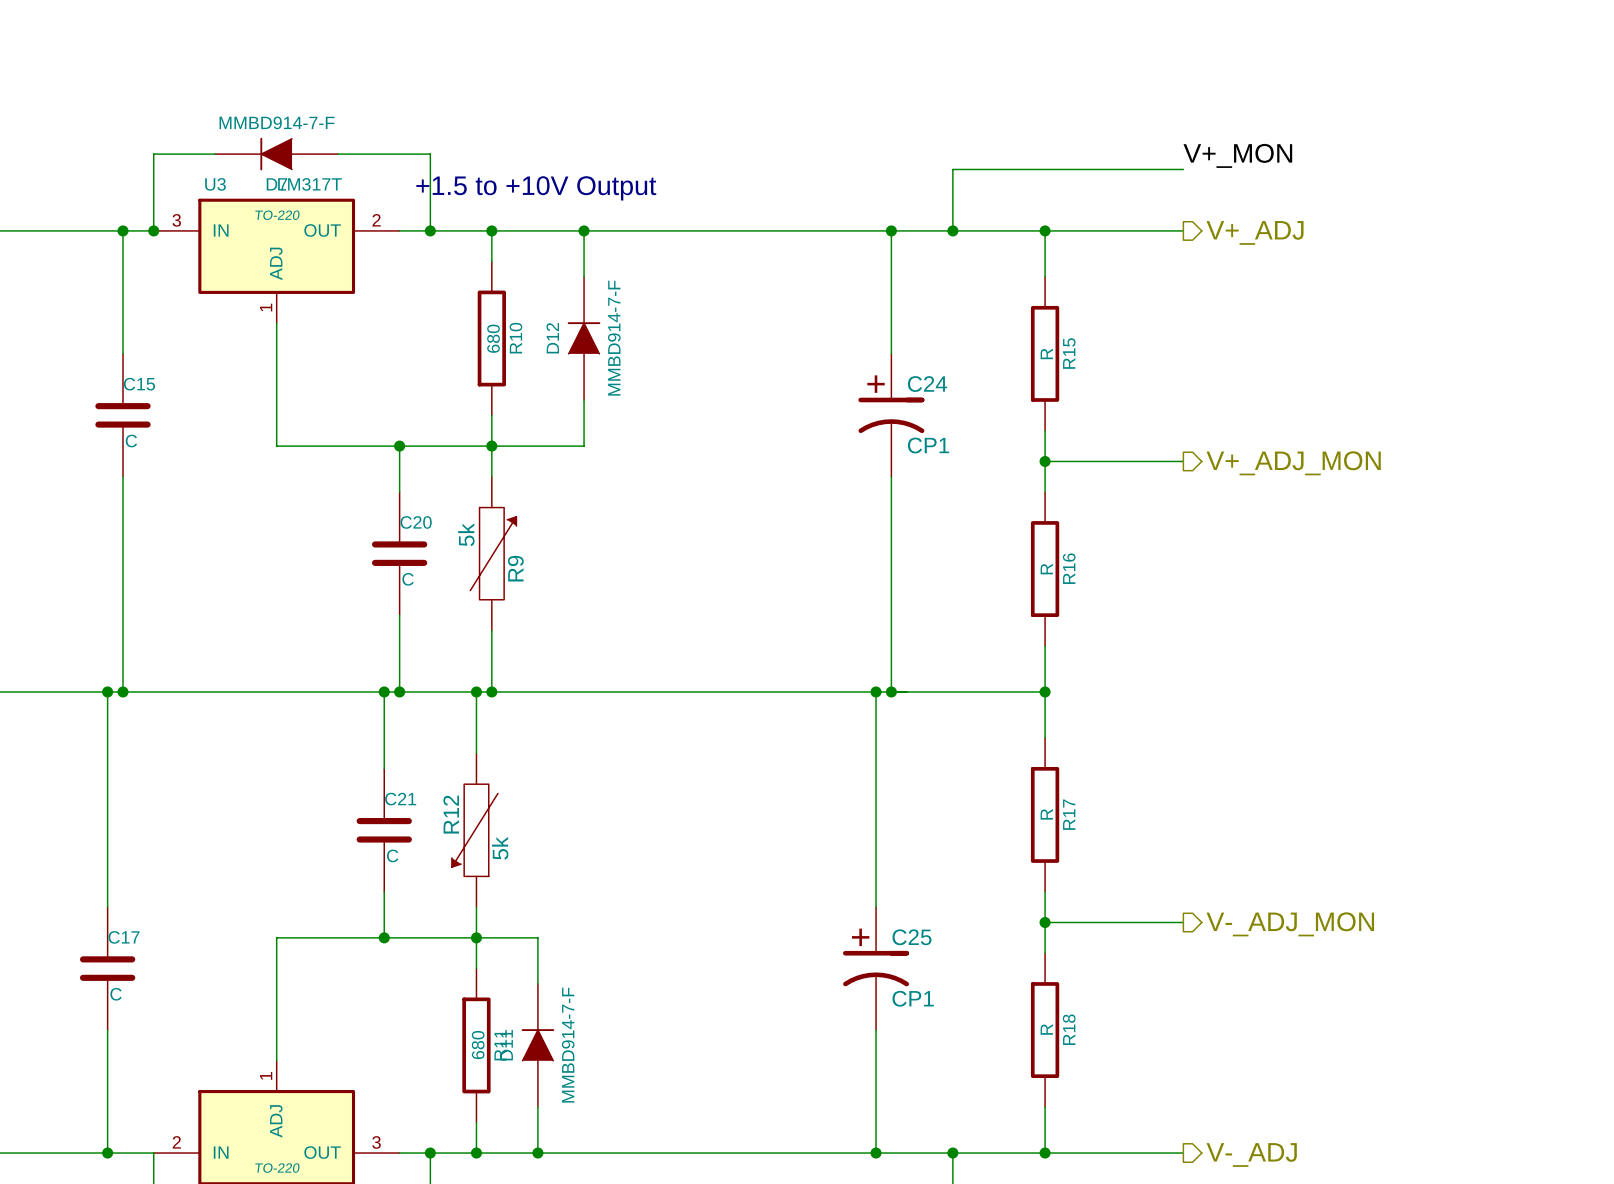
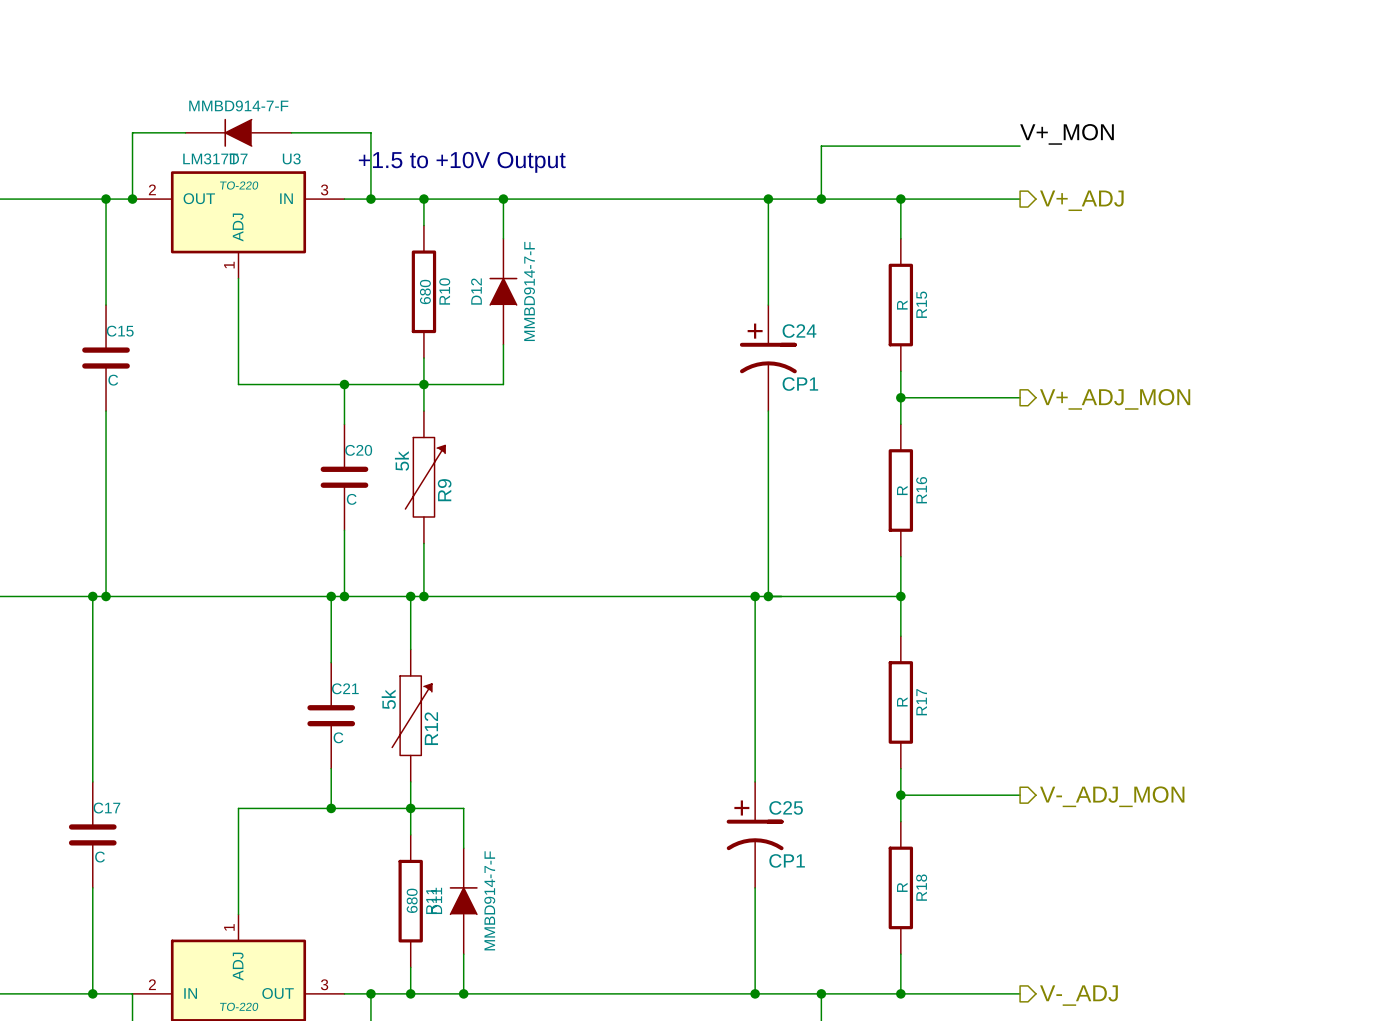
U3 flip: as is (276, 246) -> left-right (238, 212)
R12 rotation: 0° (474, 830) -> 180° (412, 715)

